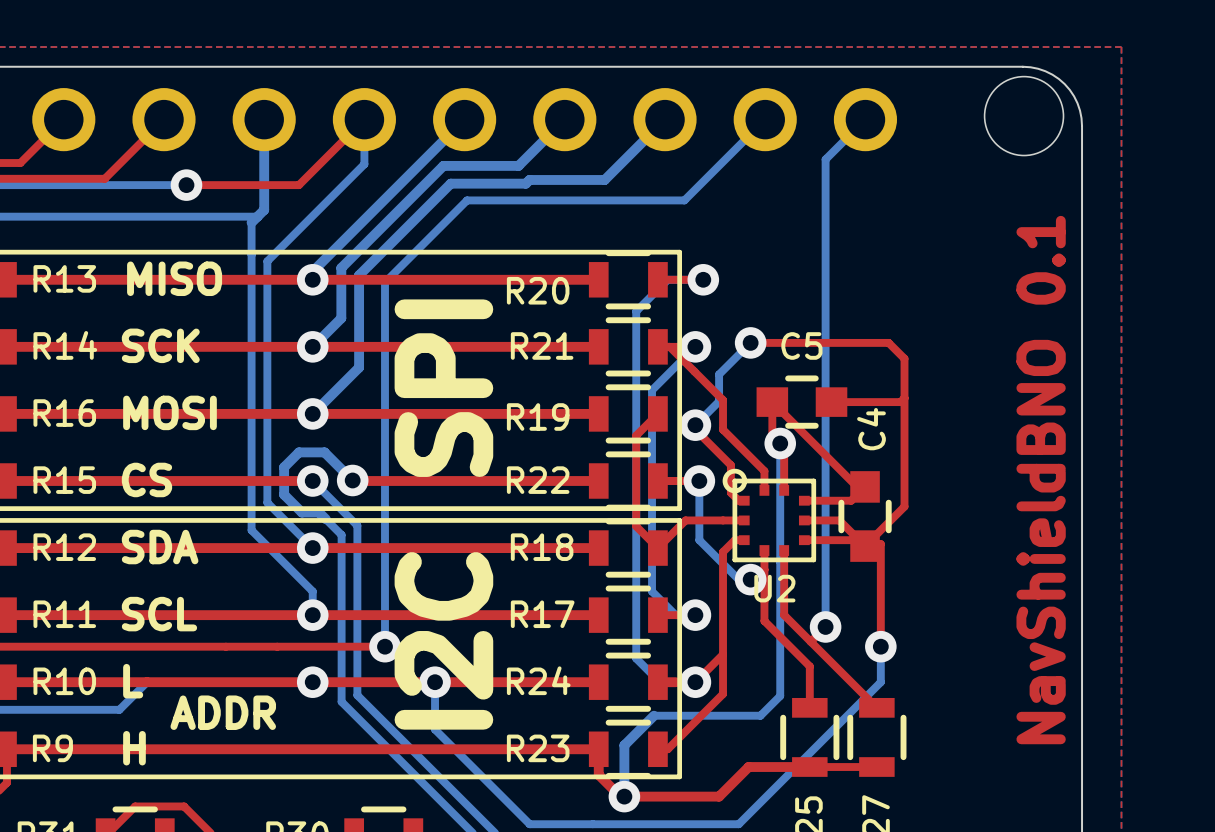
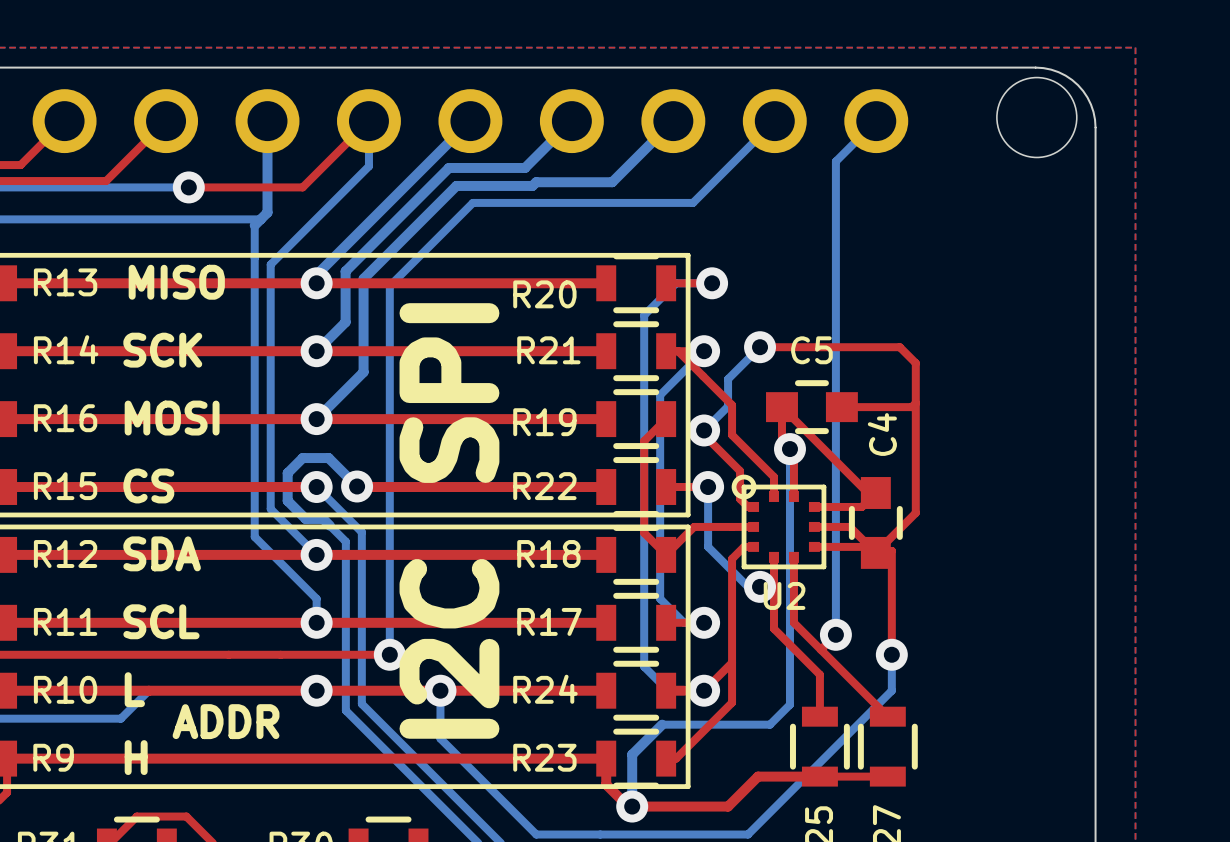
text: NavShieldBNO 0.1 (1041, 480) -> none

